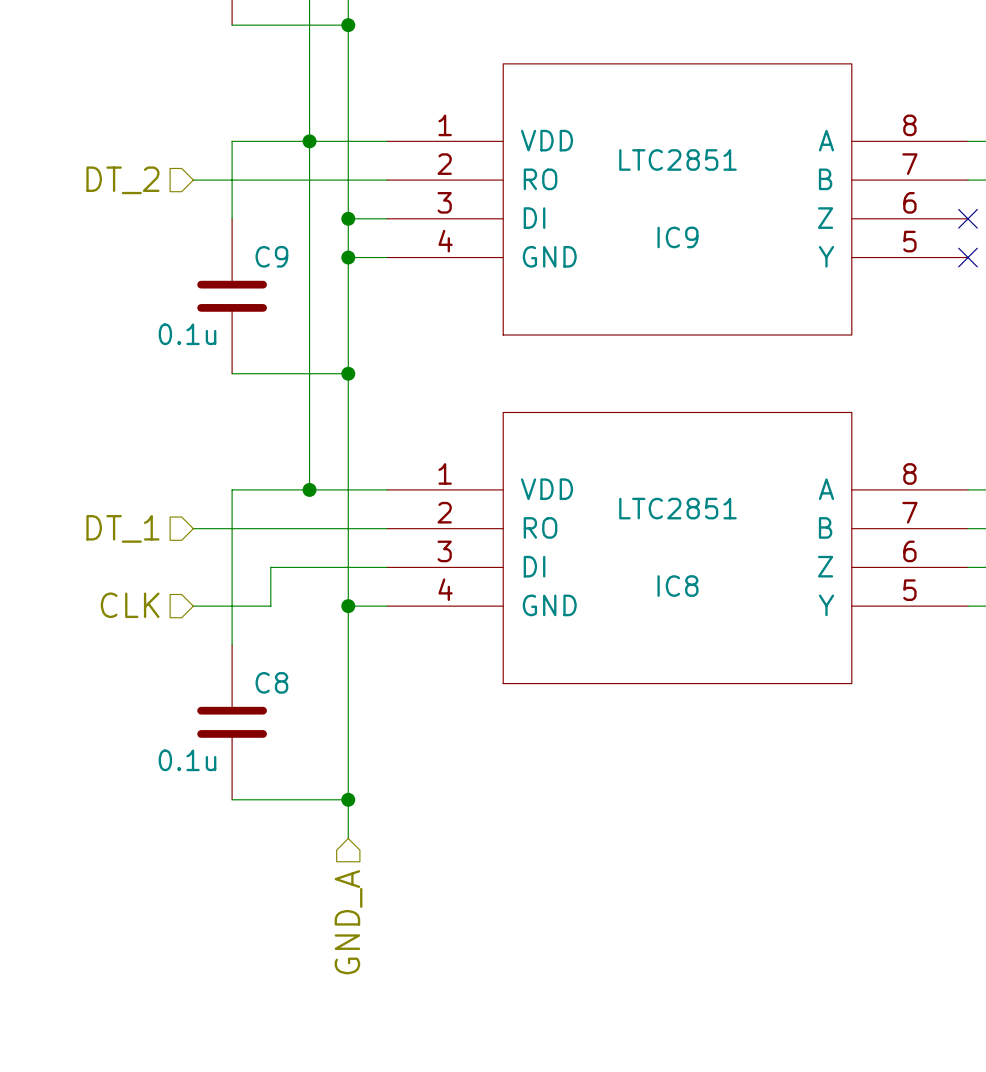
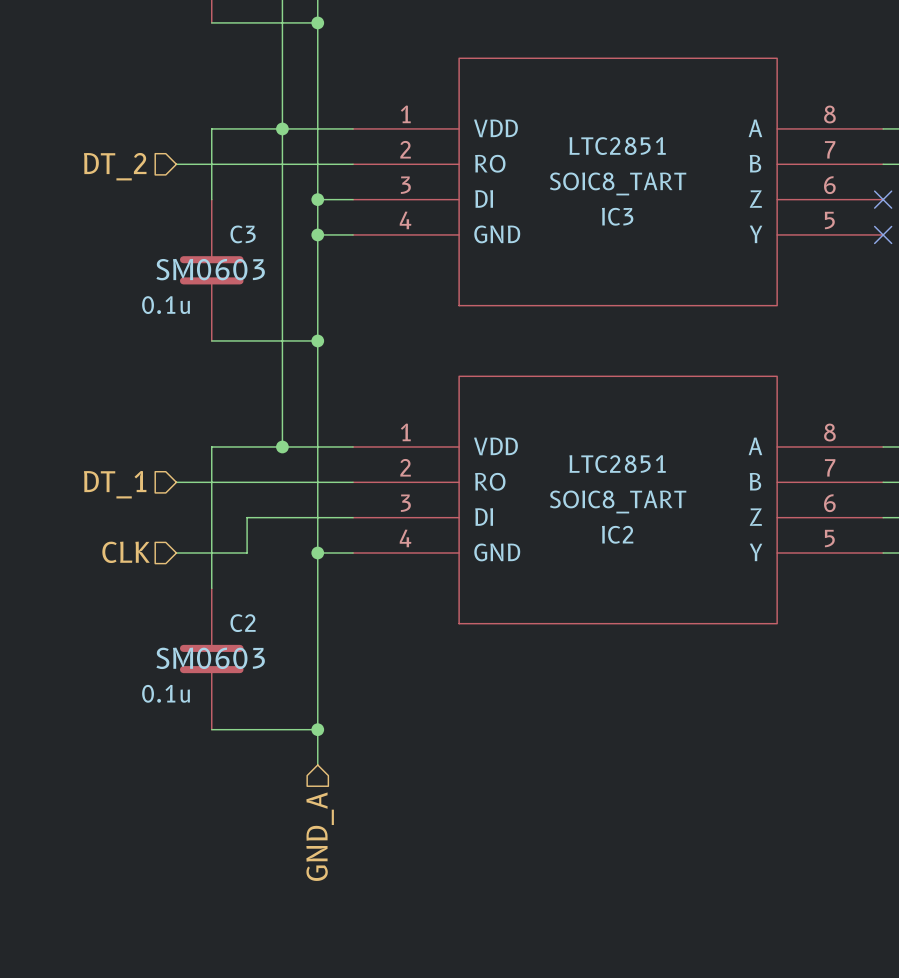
IC9 text: none -> SOIC8_TART (618, 183)
IC9 name: IC9 (677, 237) -> IC3 (617, 216)
C9 name: C9 (271, 256) -> C3 (243, 234)
C9 text: none -> SM0603 (210, 269)
IC8 text: none -> SOIC8_TART (618, 501)
IC8 name: IC8 (677, 586) -> IC2 (617, 534)
C8 name: C8 (271, 682) -> C2 (243, 623)
C8 text: none -> SM0603 (210, 658)

